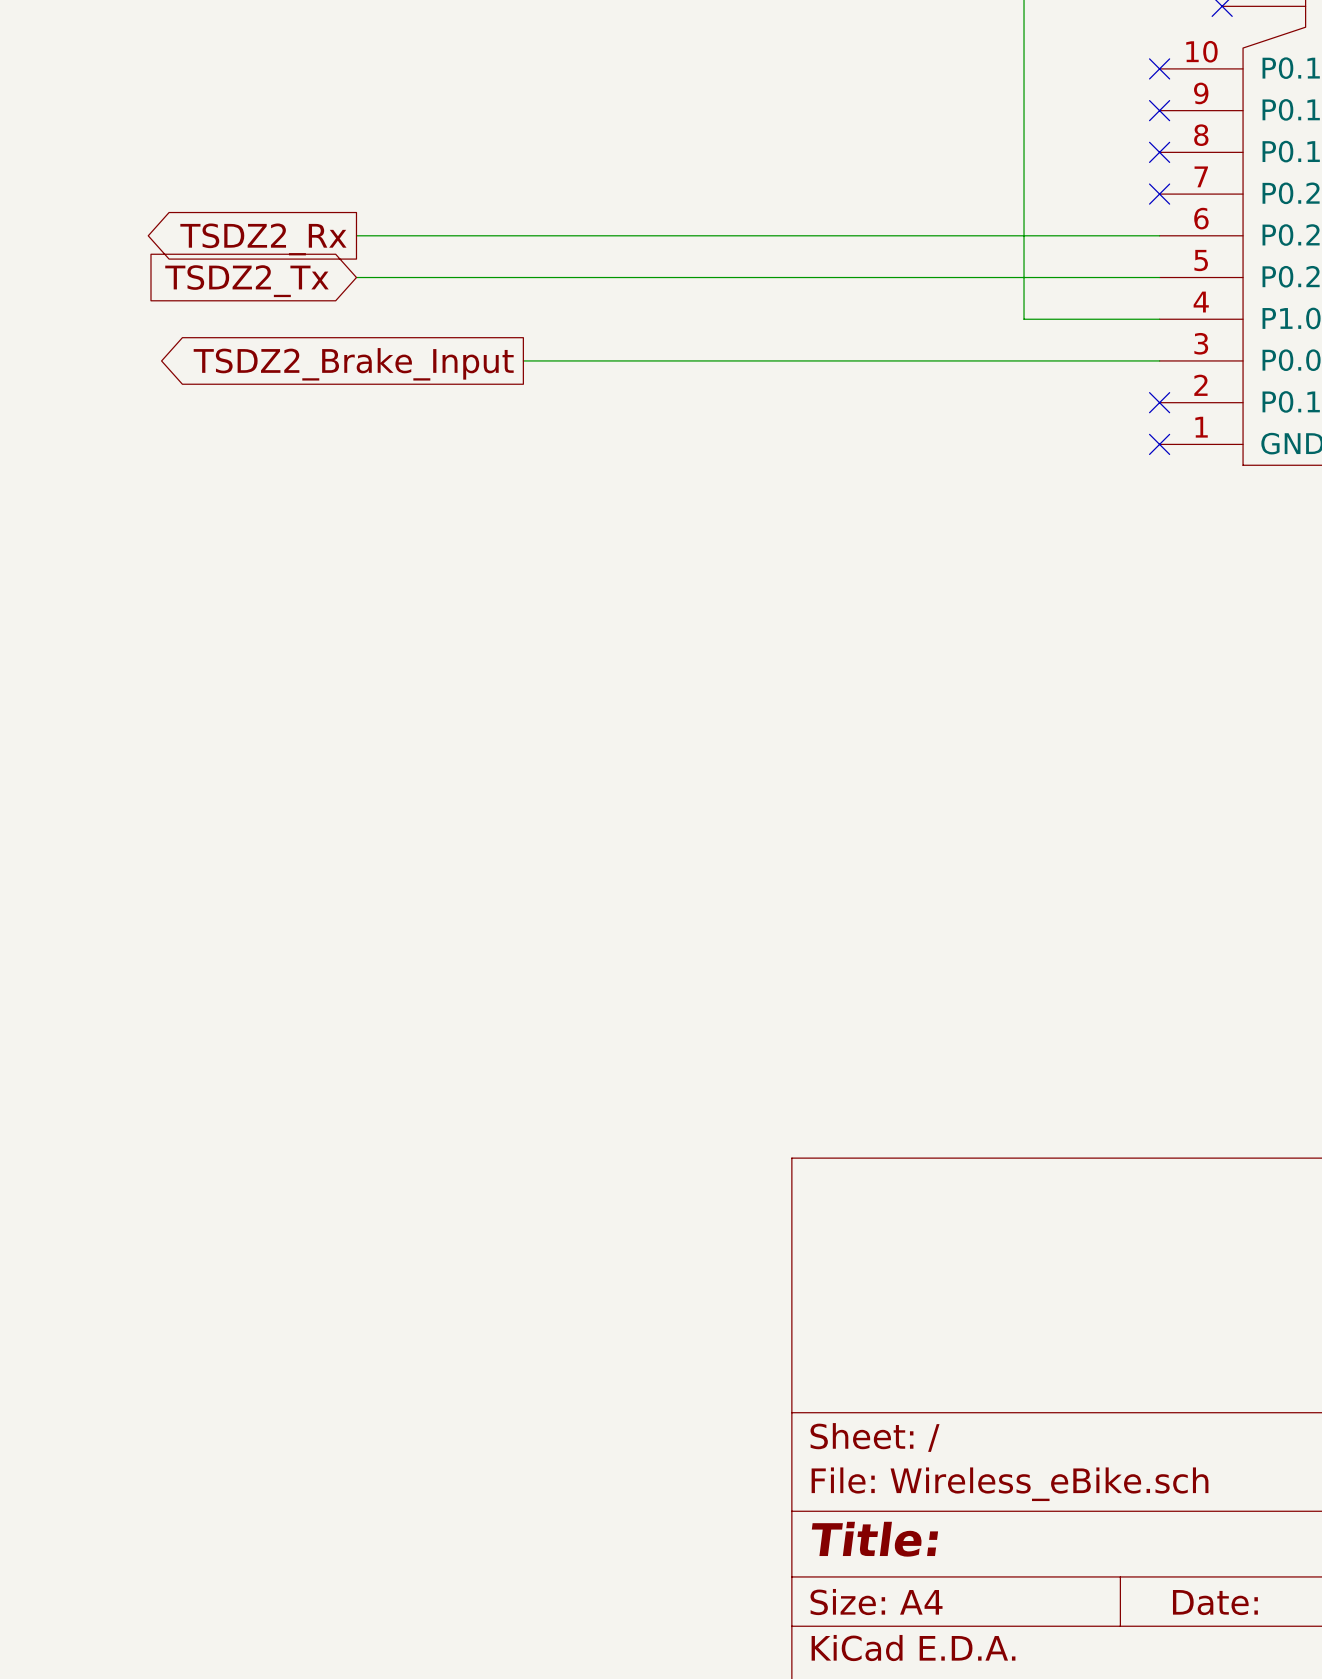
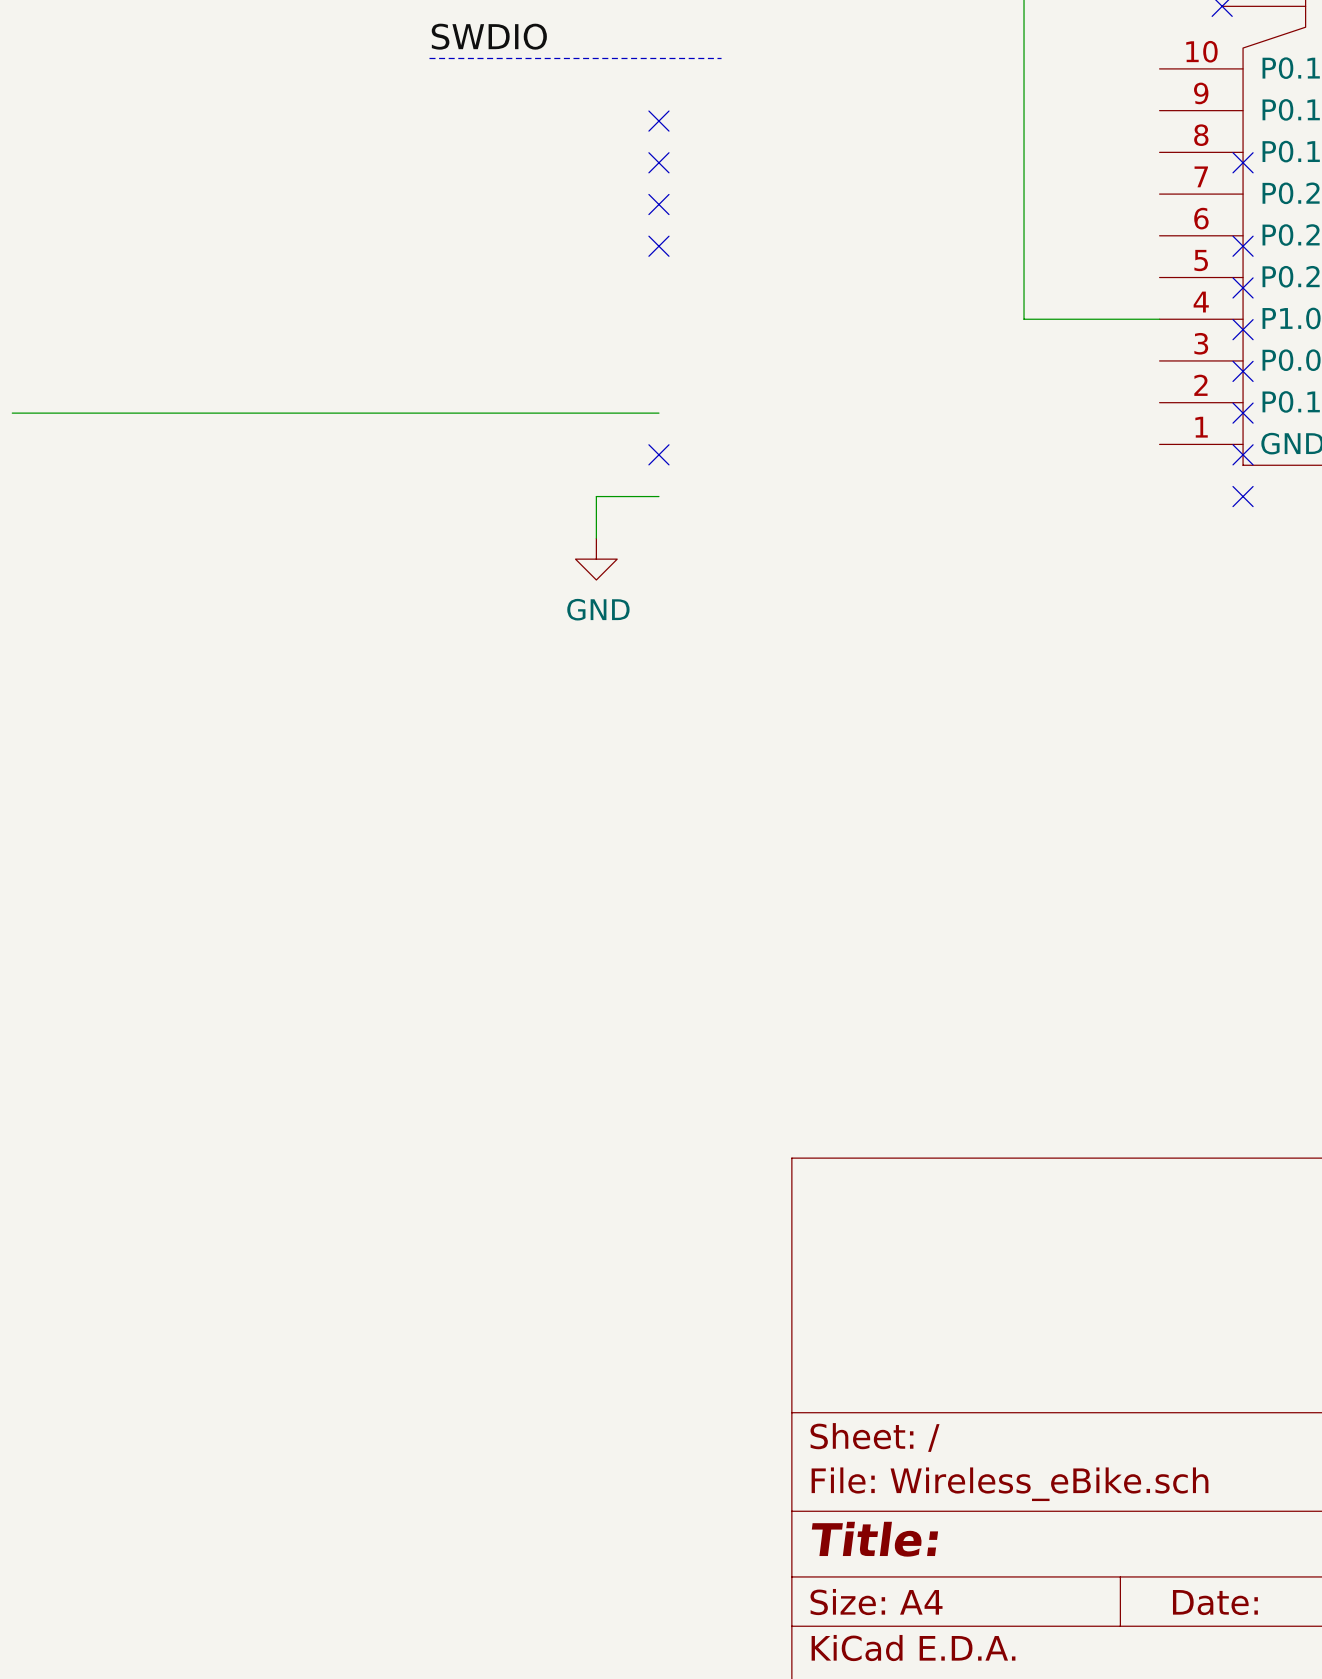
label: none -> SWDIO (489, 36)
line: none -> (429, 58) (721, 58)
no-connect mark: (1159, 68) -> none
no-connect mark: (1159, 110) -> none
no-connect mark: none -> (658, 121)
no-connect mark: (1159, 152) -> none
no-connect mark: none -> (658, 162)
no-connect mark: none -> (1243, 162)
no-connect mark: (1159, 194) -> none
no-connect mark: none -> (658, 204)
wire: (356, 235) (1159, 235) -> none
global label: TSDZ2_Rx (263, 239) -> none
no-connect mark: none -> (658, 246)
no-connect mark: none -> (1243, 246)
wire: (356, 277) (1159, 277) -> none
global label: TSDZ2_Tx (246, 281) -> none
no-connect mark: none -> (1243, 287)
no-connect mark: none -> (1243, 329)
wire: (523, 360) (1159, 360) -> none
global label: TSDZ2_Brake_Input (353, 364) -> none
no-connect mark: none -> (1243, 371)
no-connect mark: (1159, 402) -> none
wire: none -> (12, 413) (658, 413)
no-connect mark: none -> (1243, 413)
no-connect mark: (1159, 444) -> none
no-connect mark: none -> (658, 454)
no-connect mark: none -> (1243, 454)
wire: none -> (658, 496) (596, 496) (596, 538)
no-connect mark: none -> (1243, 496)
power symbol: none -> GND (596, 559)

